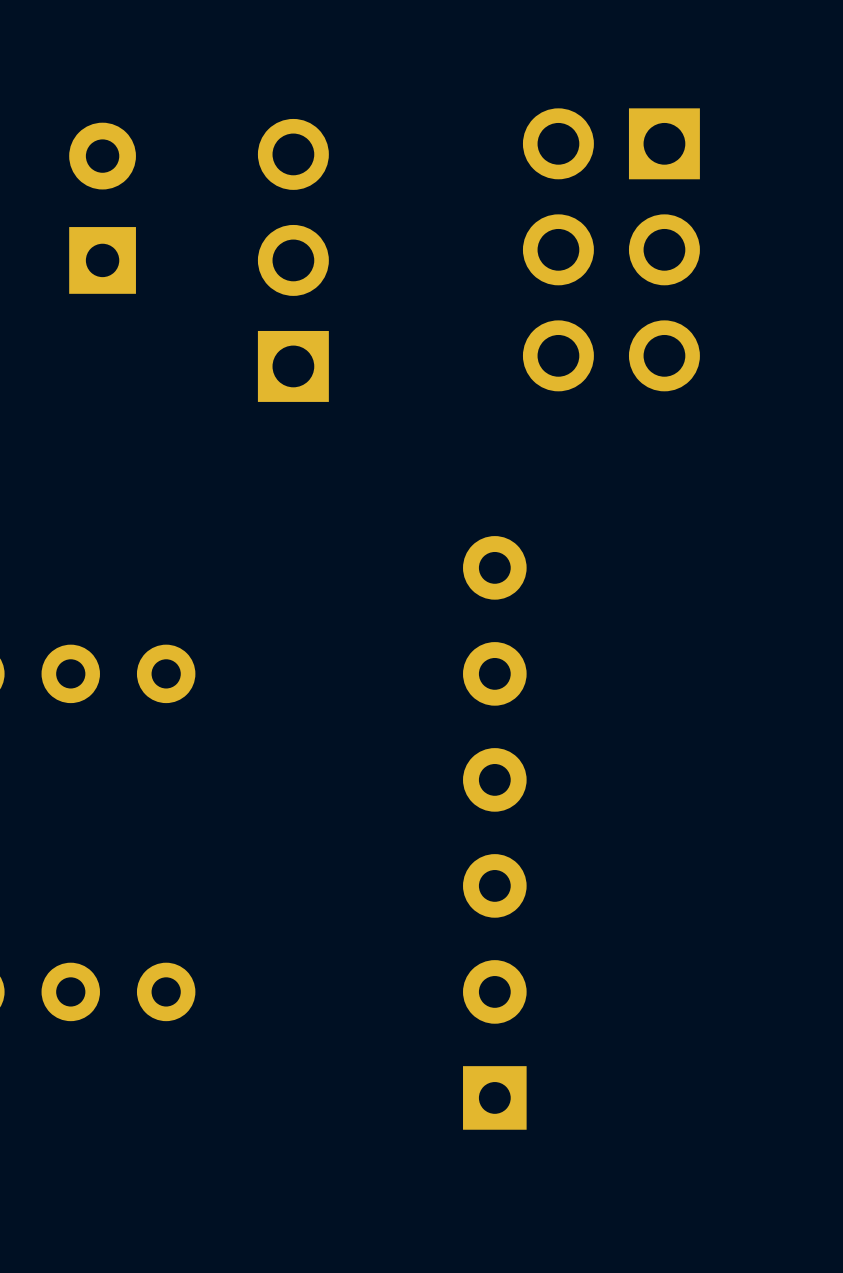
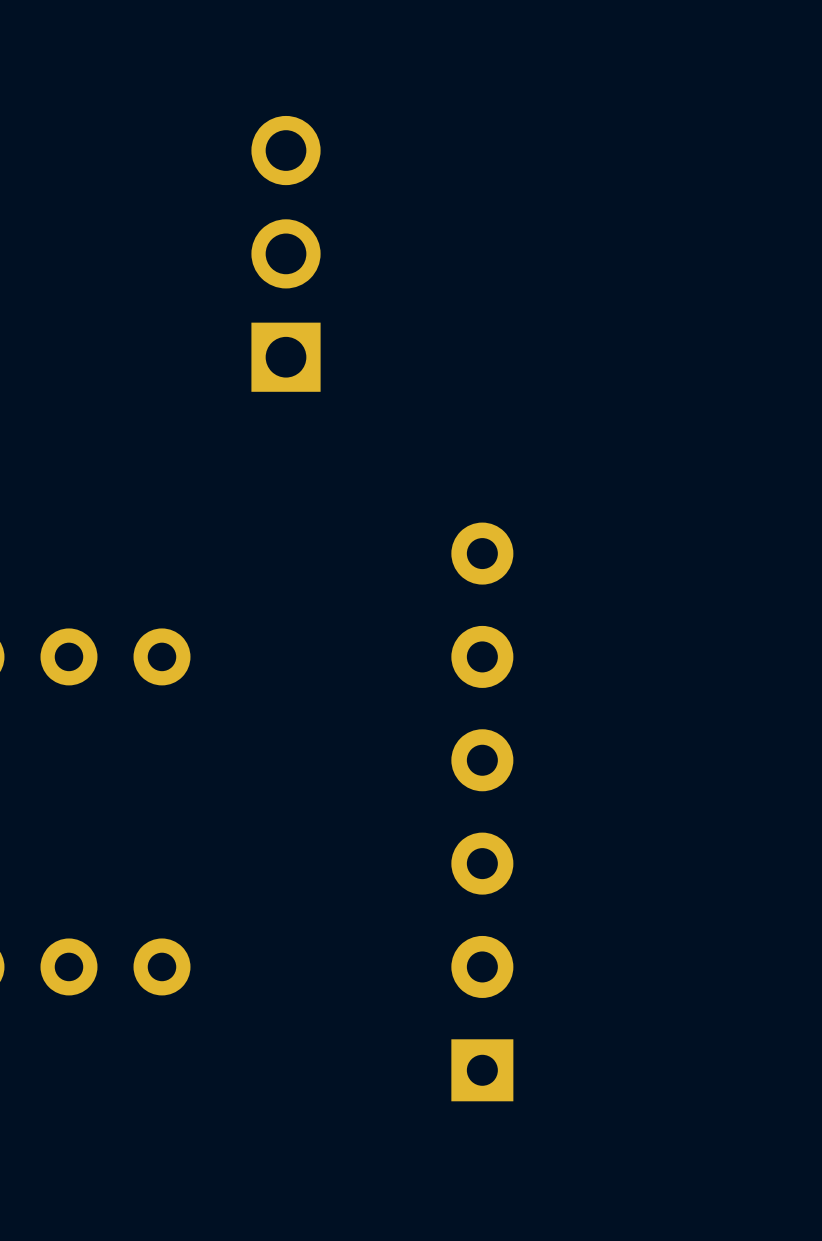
part: (102, 208) -> none
part: (611, 249) -> none

